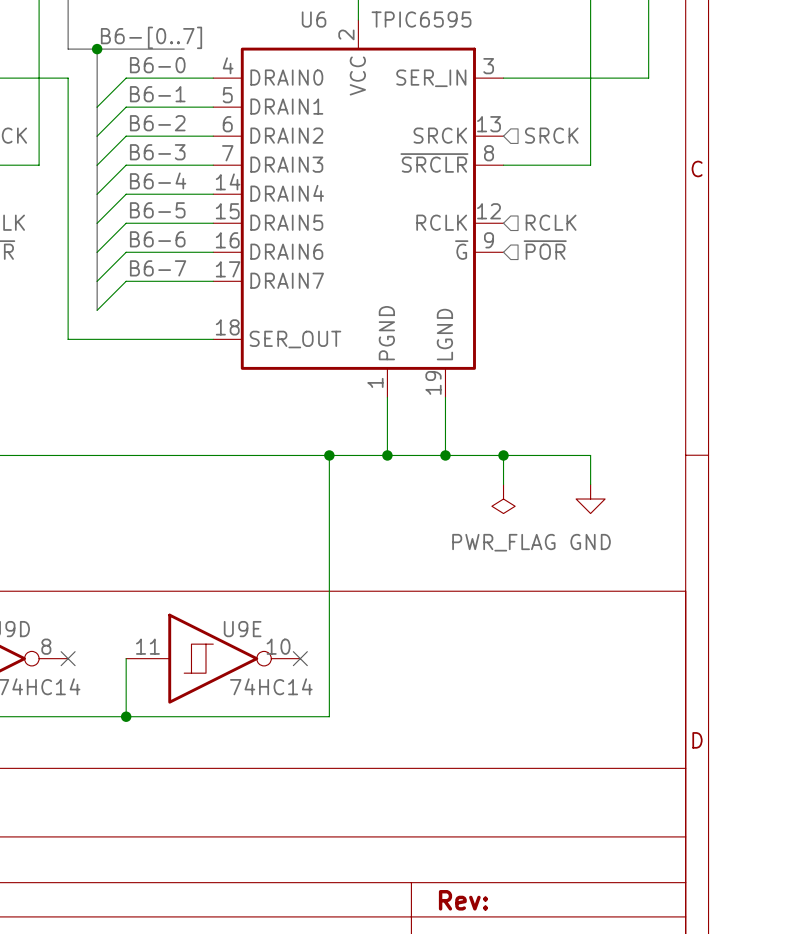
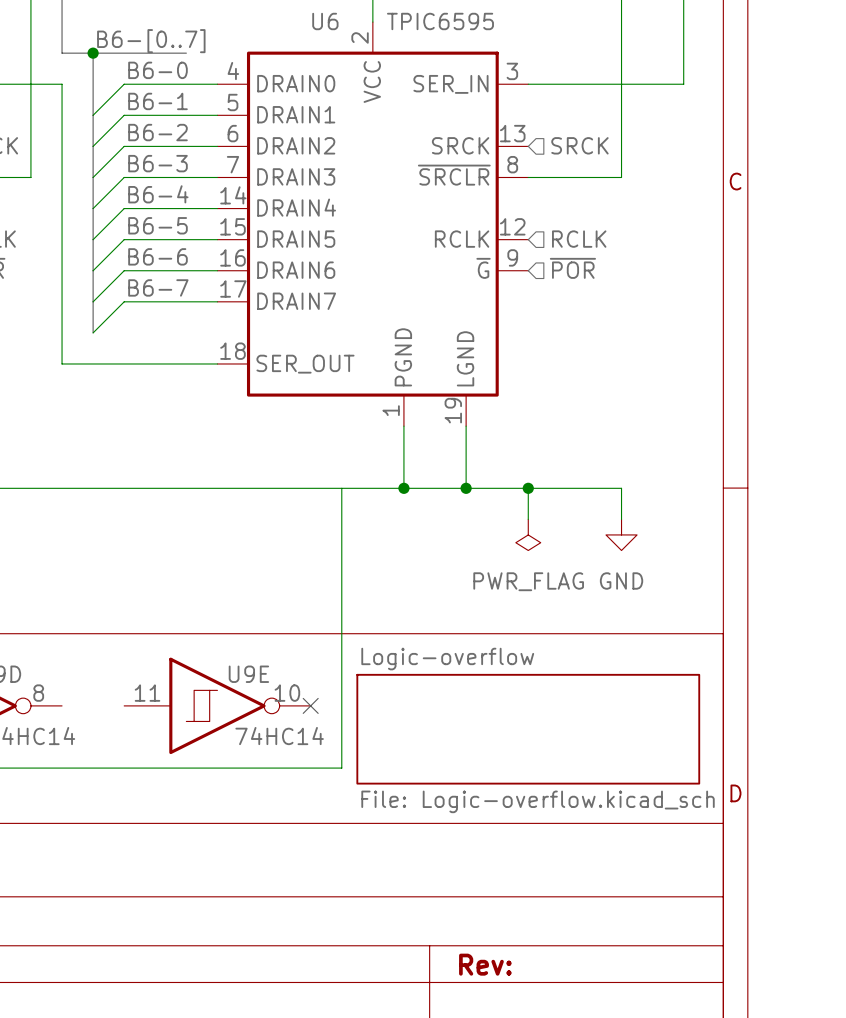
junction: (329, 455) -> none
no-connect mark: (68, 658) -> none
wire: (126, 658) (126, 716) -> none
sheet Logic-overflow: none -> File: Logic-overflow.kicad_sch (528, 729)
junction: (126, 716) -> none

